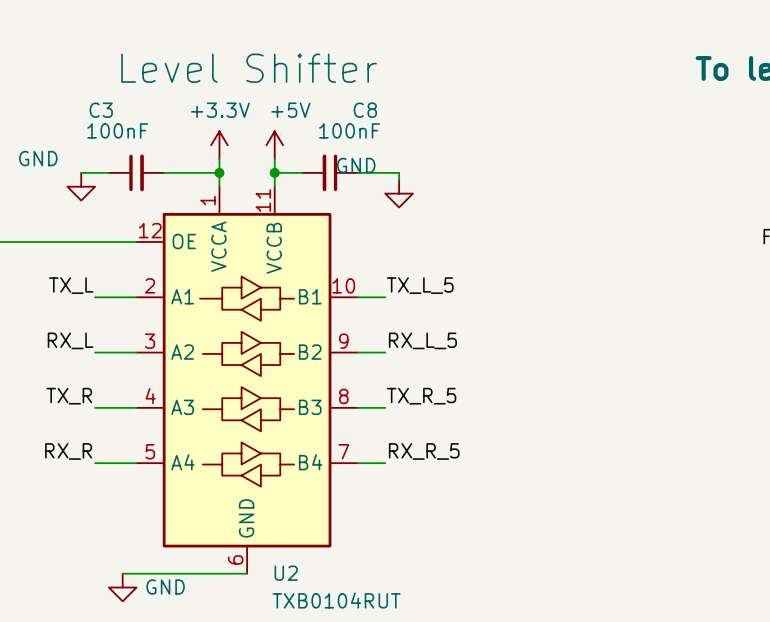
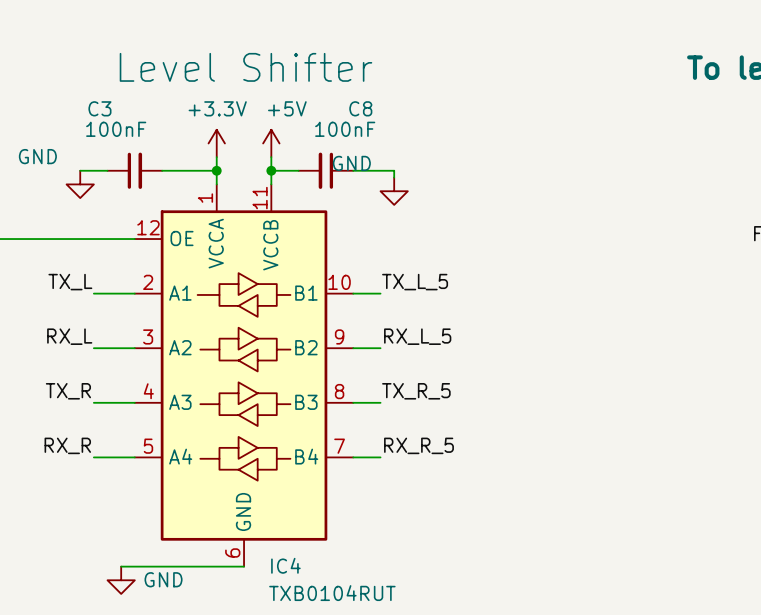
U2 name: U2 (286, 573) -> IC4 (285, 565)

